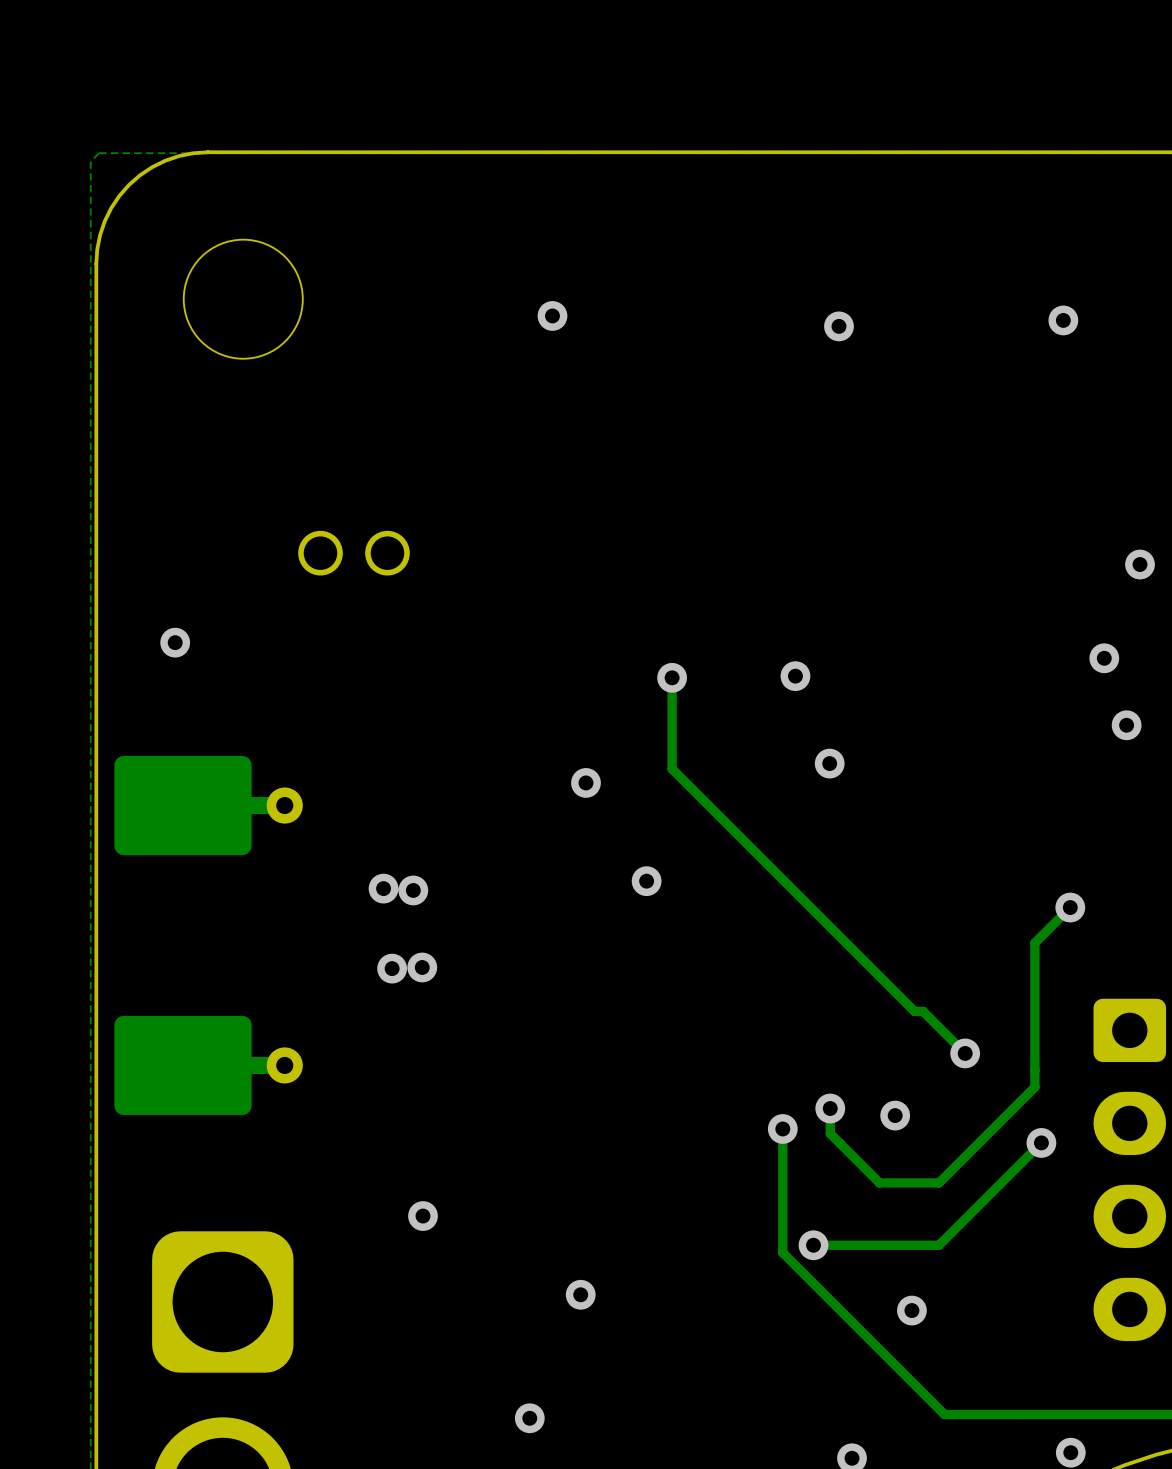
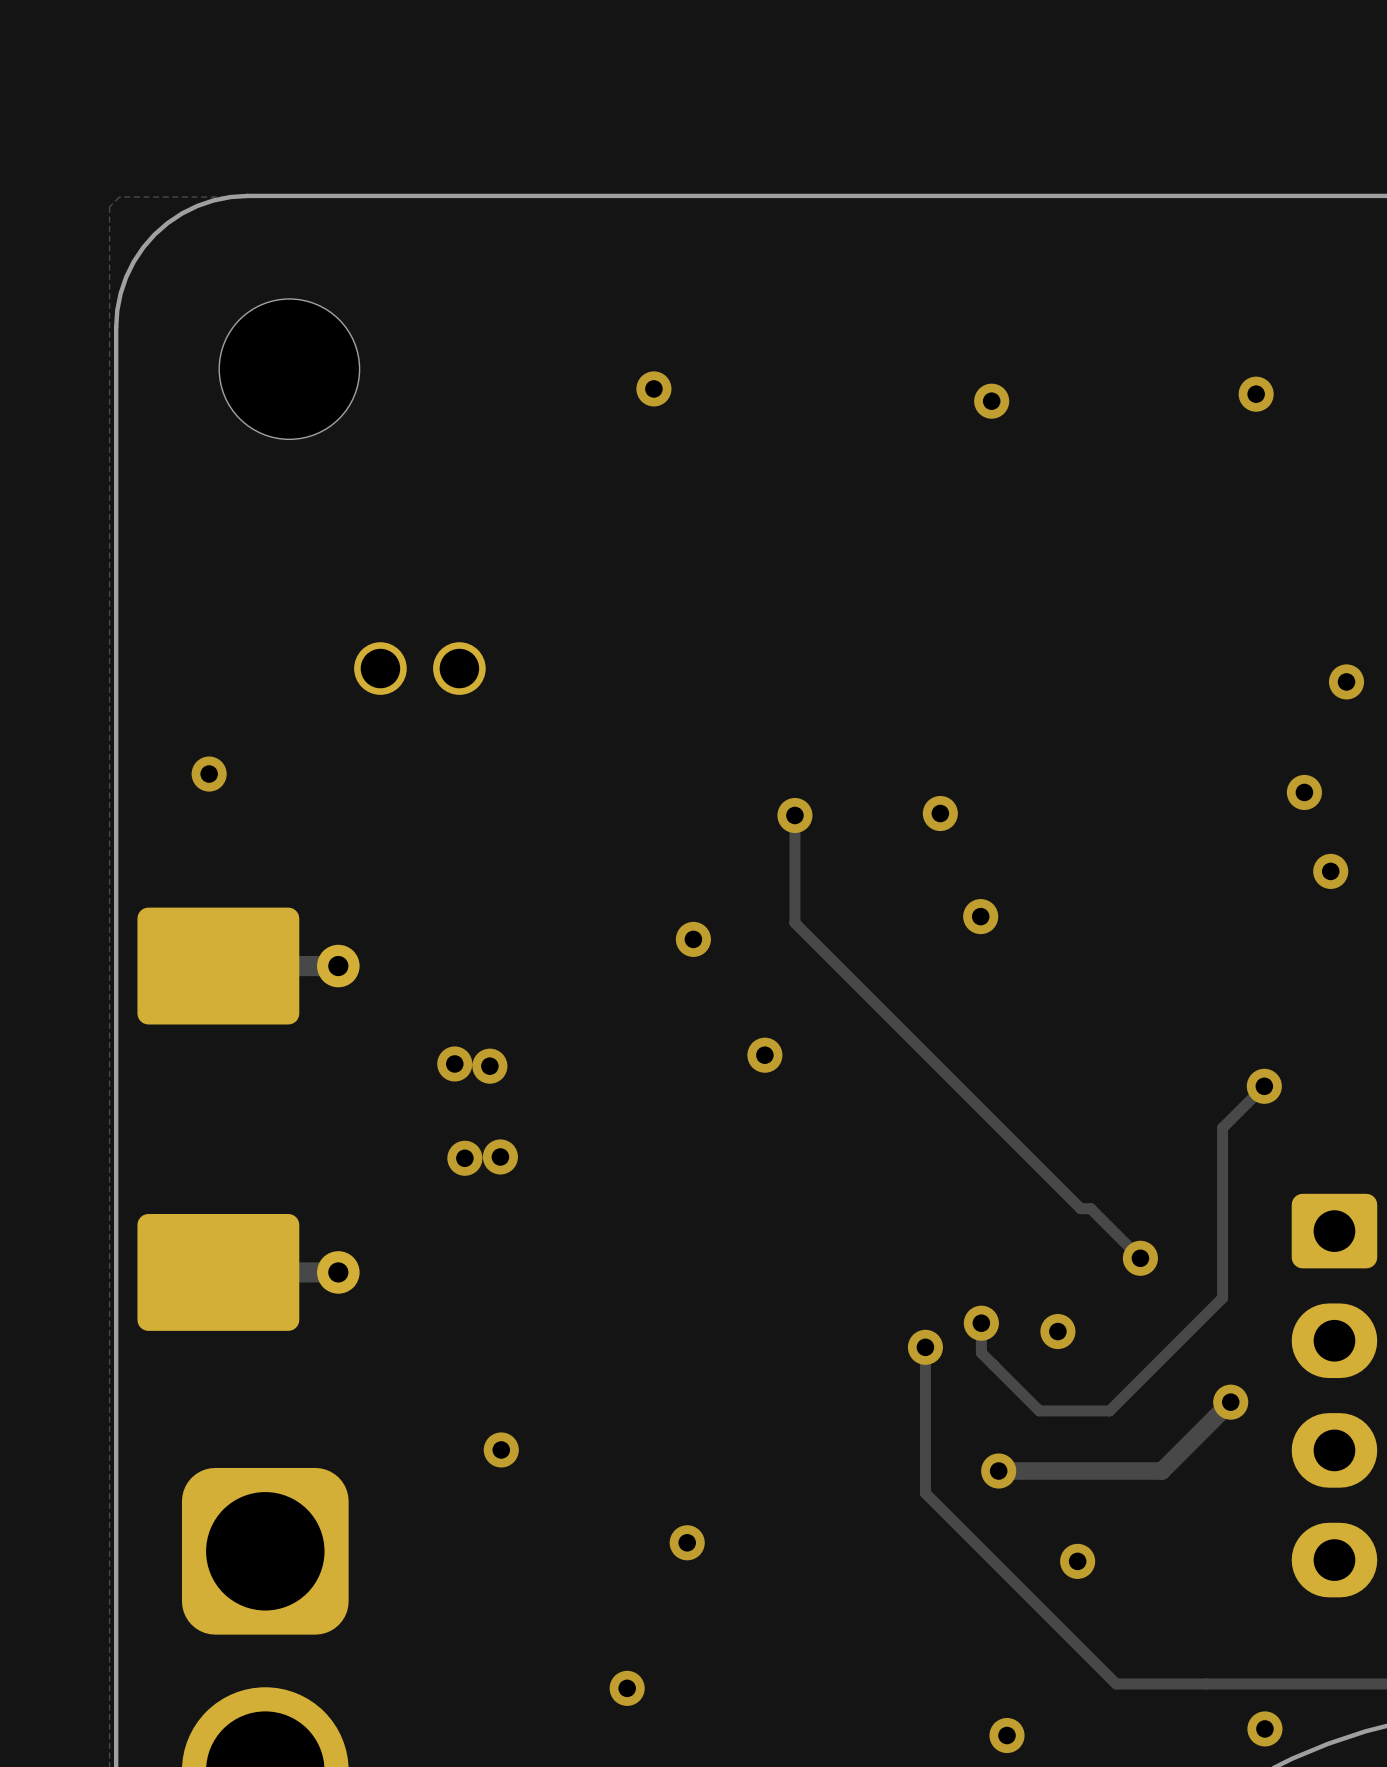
track: (1041, 1142) (939, 1245) (813, 1245) -> none
via position: (1041, 1142) -> (1230, 1402)
track: none -> (1230, 1402) (1161, 1471) (998, 1471)
via position: (813, 1245) -> (998, 1471)

